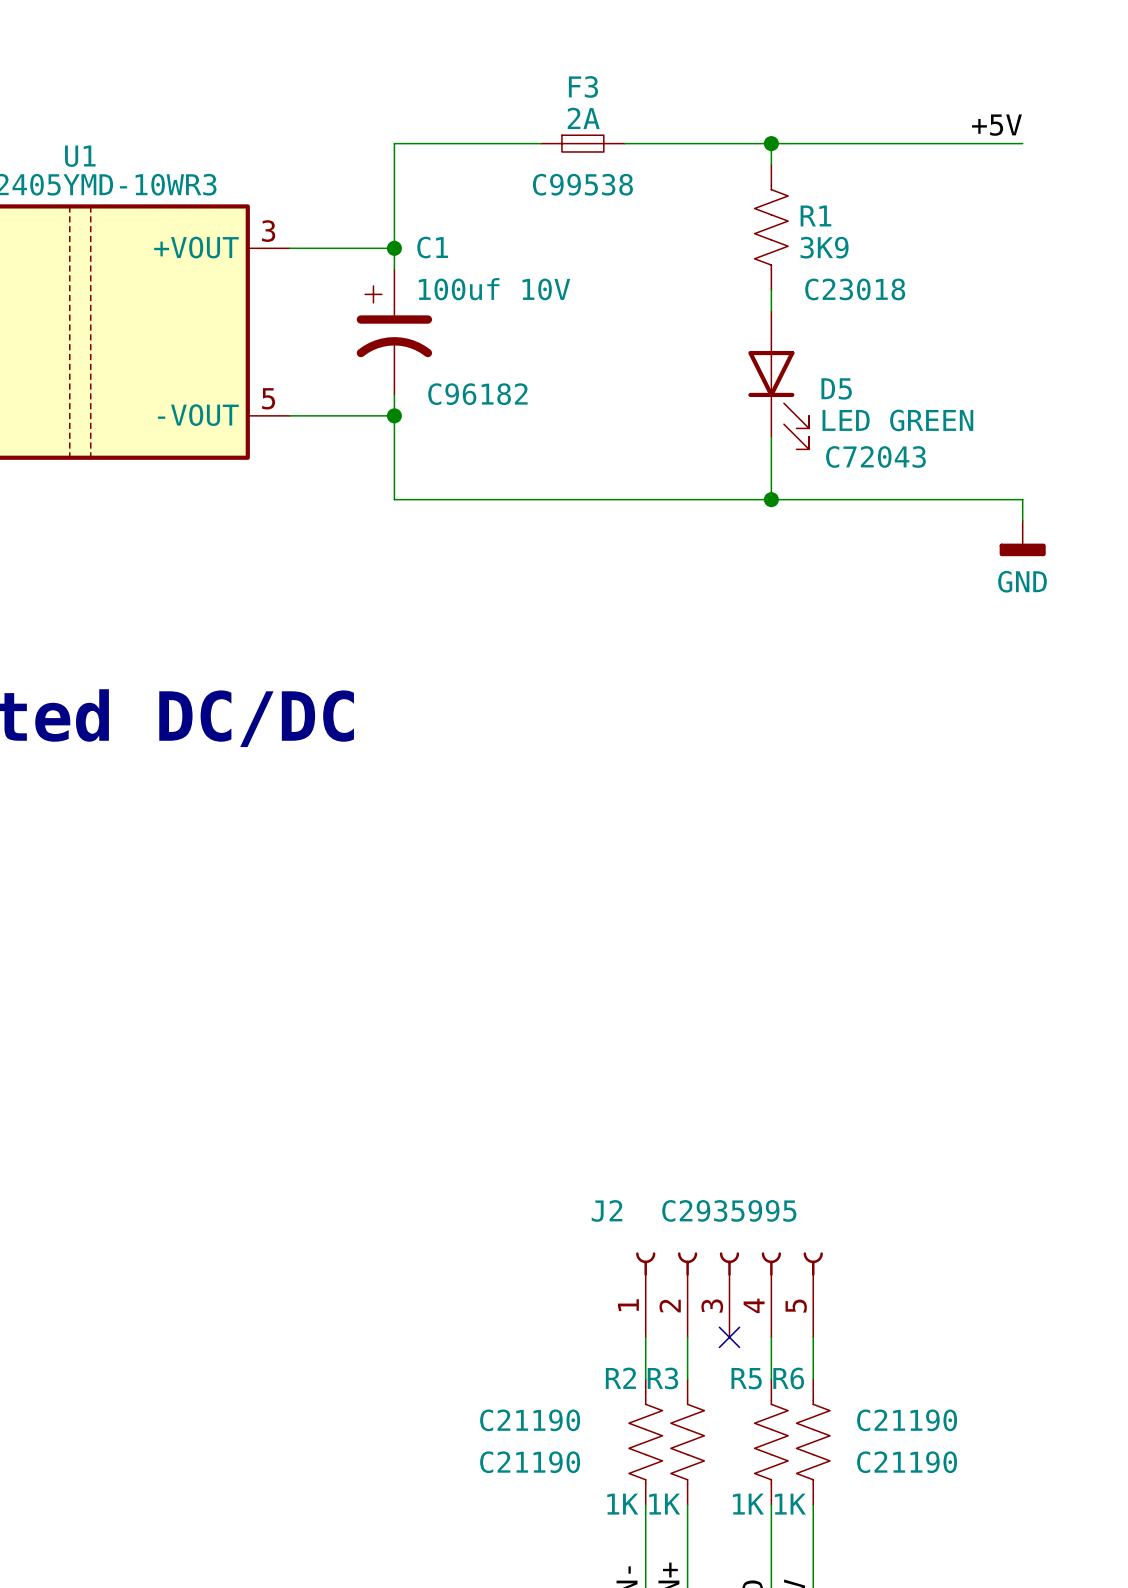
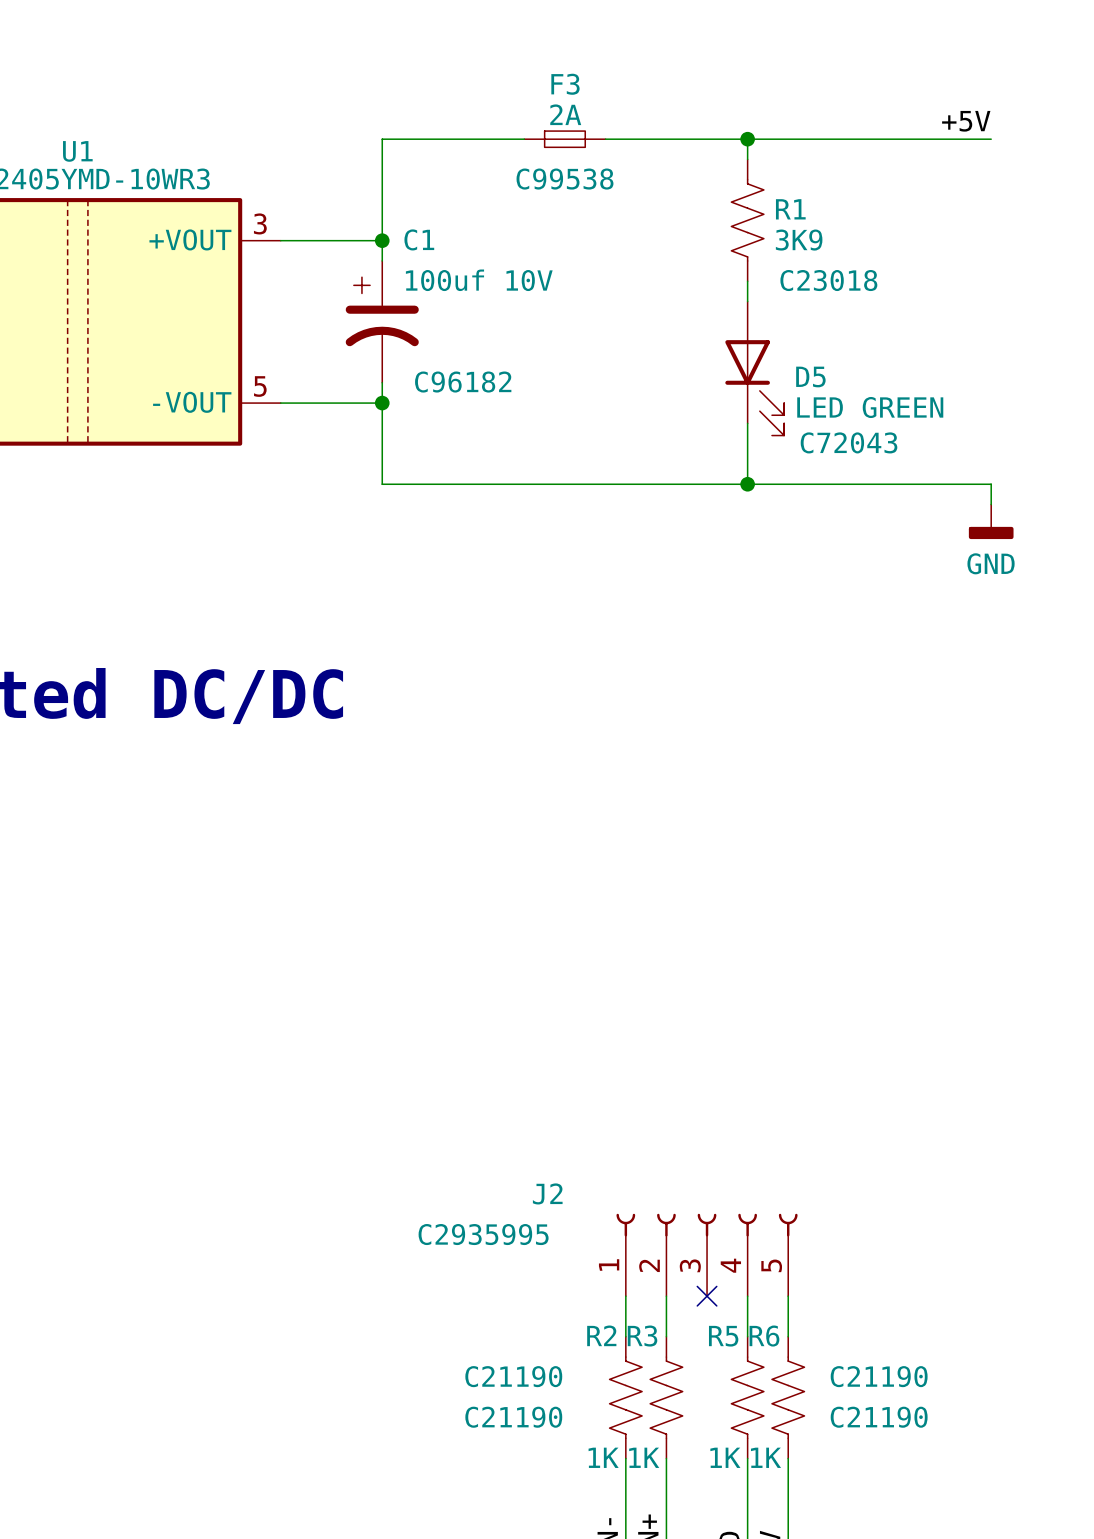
J2 name position: J2 (607, 1210) -> J2 (547, 1193)
J2 text position: C2935995 (729, 1210) -> C2935995 (483, 1234)

